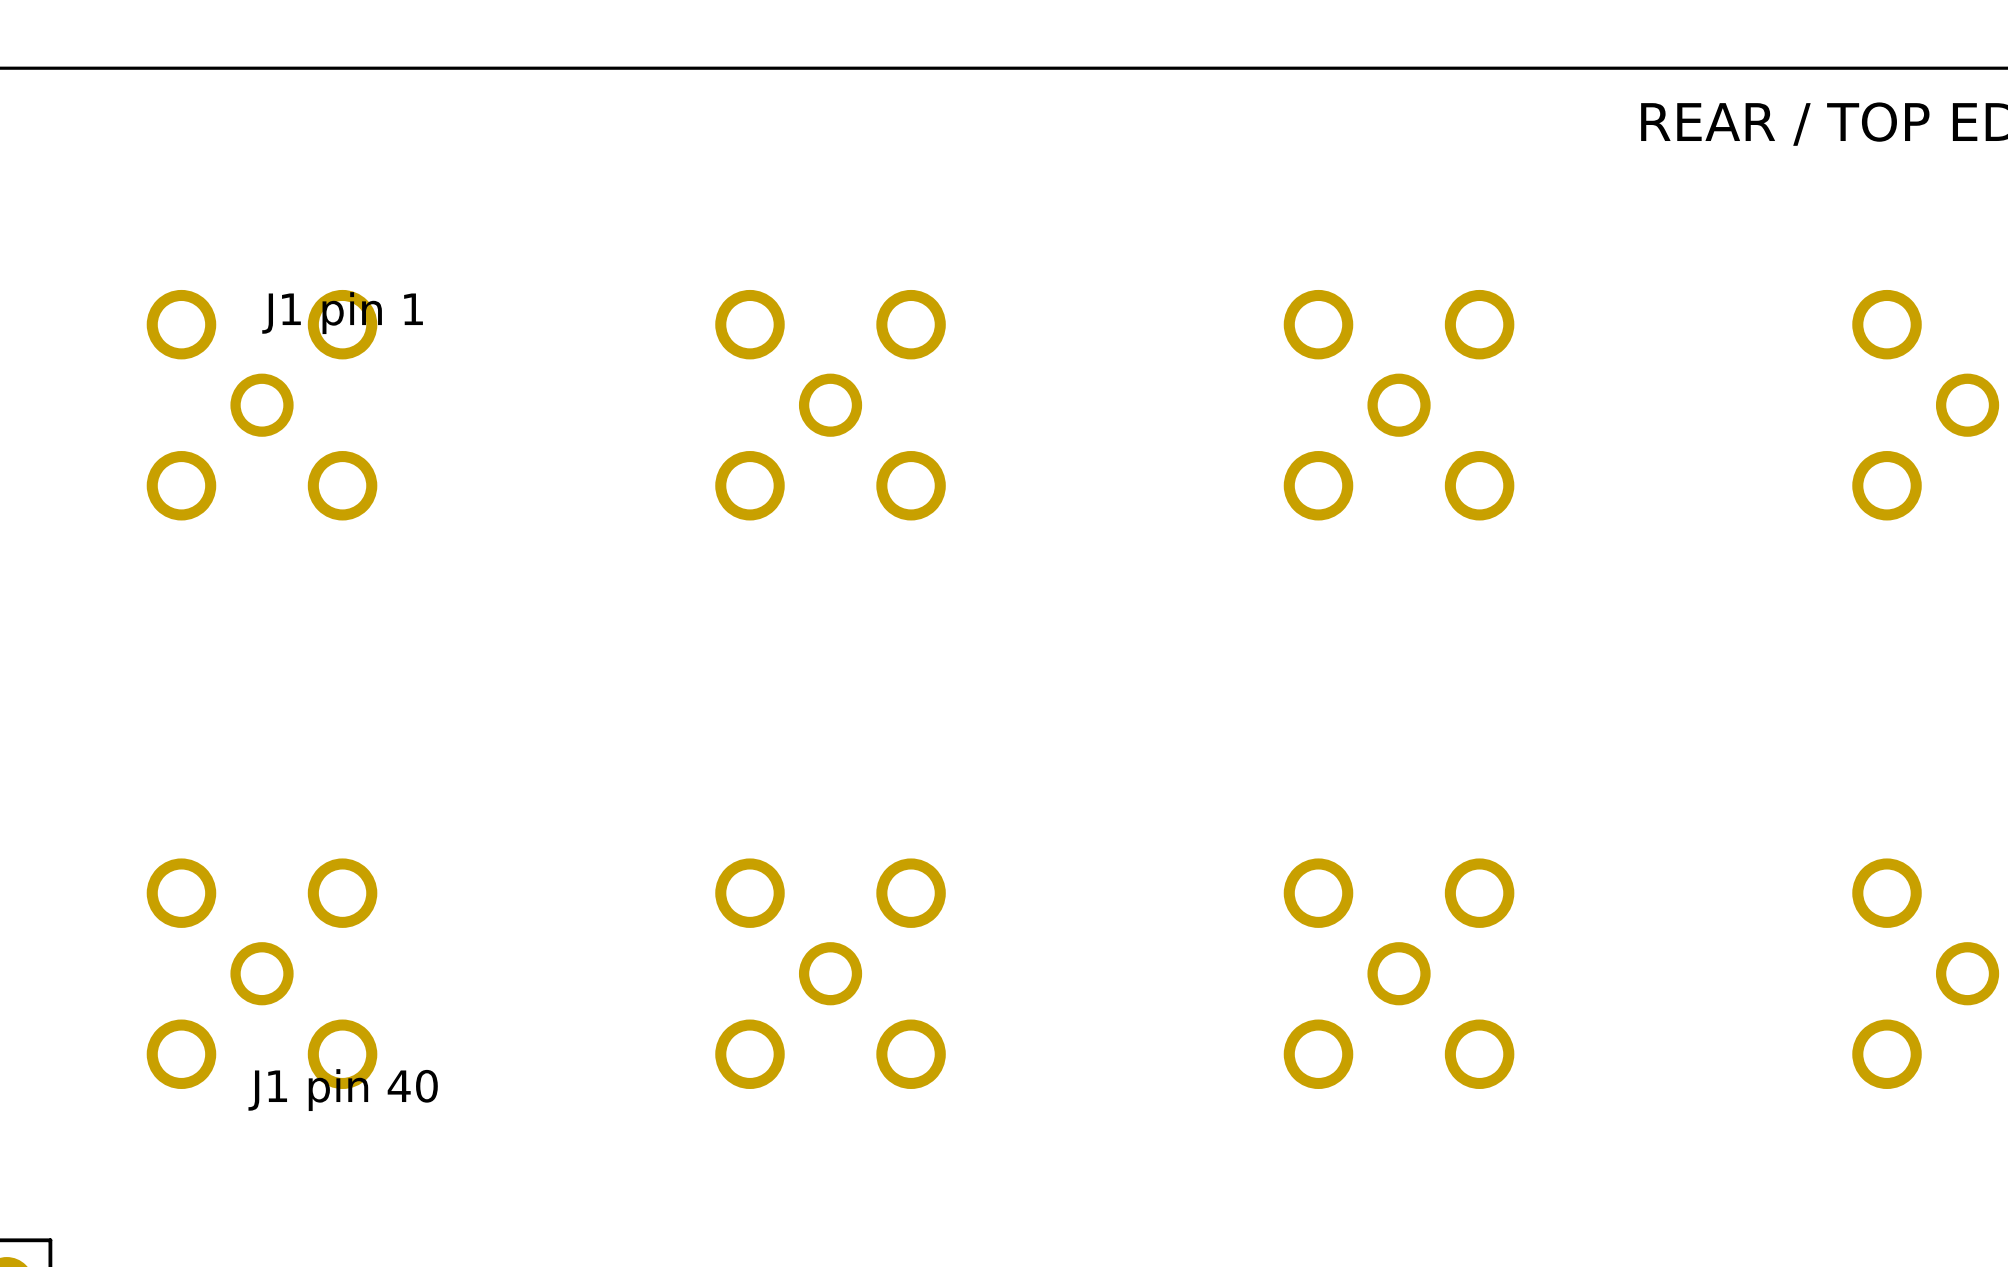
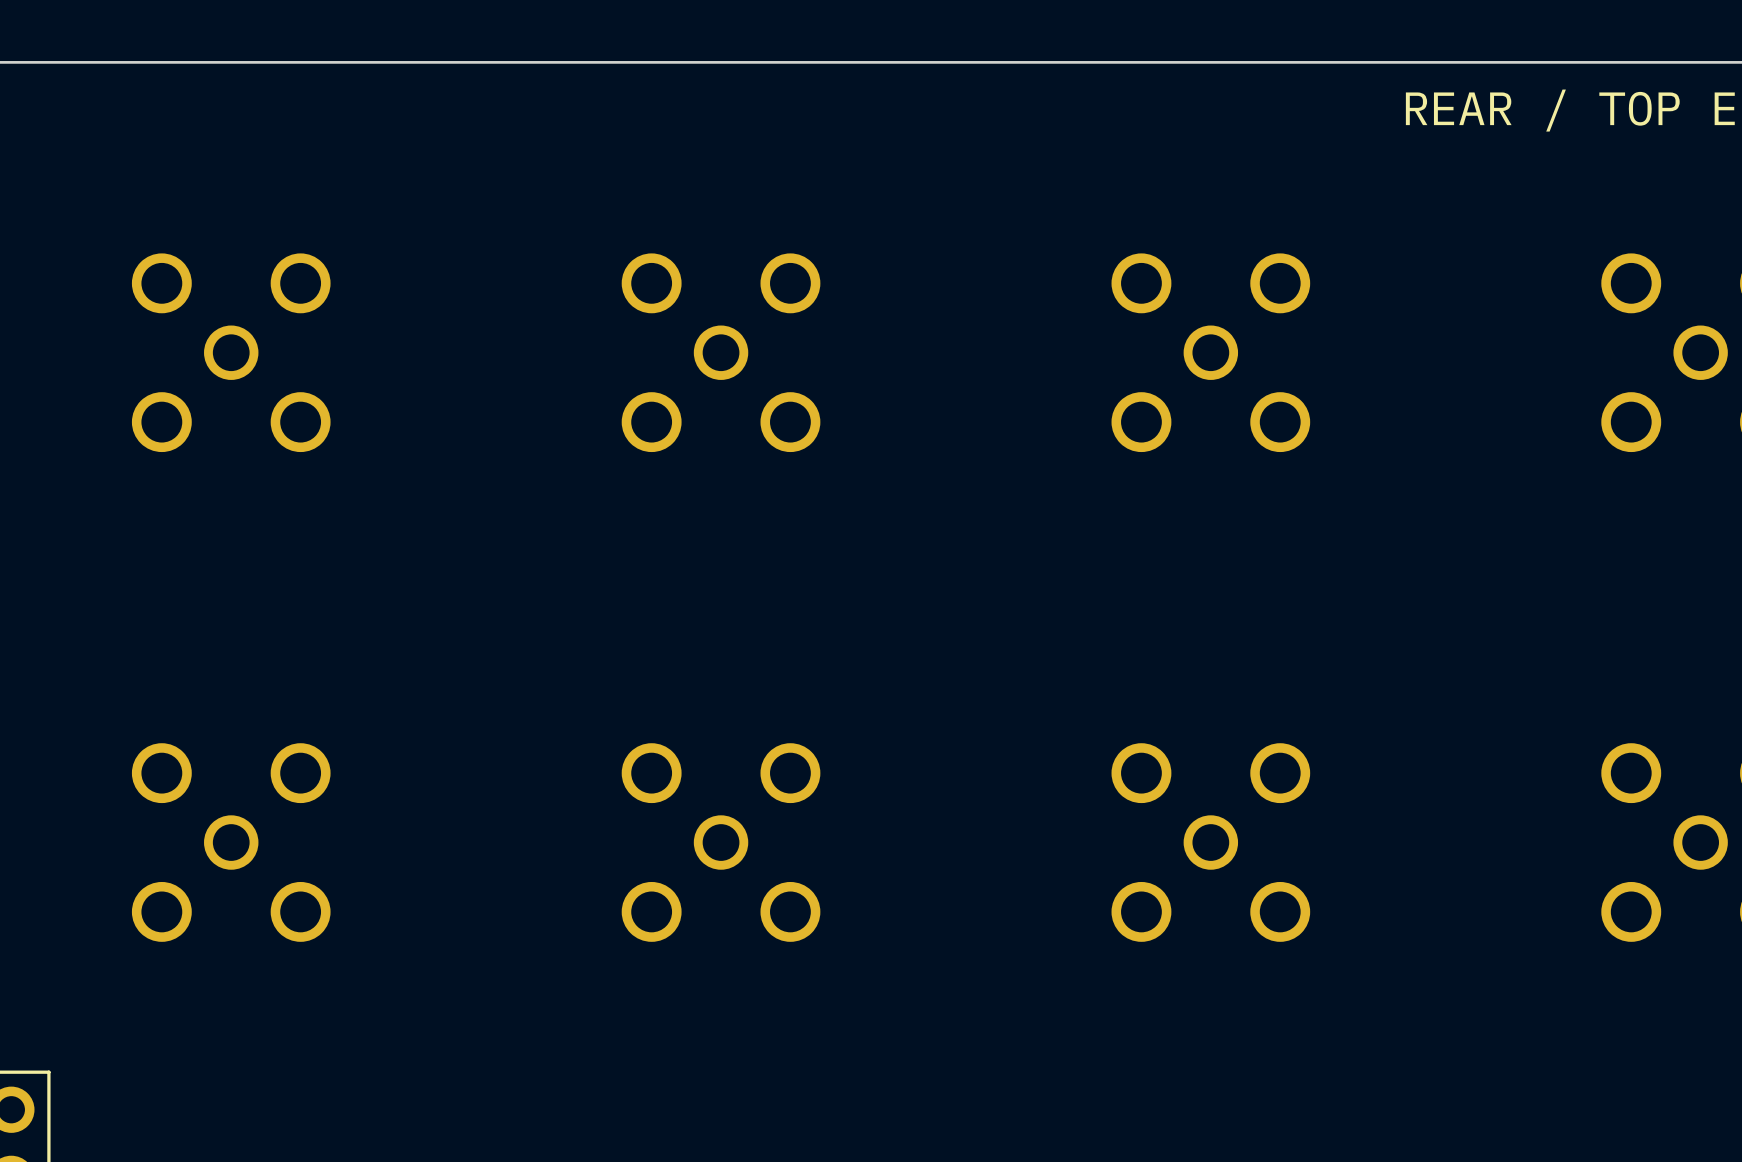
text: J1 pin 1 (342, 313) -> none
text: J1 pin 40 (343, 1090) -> none

